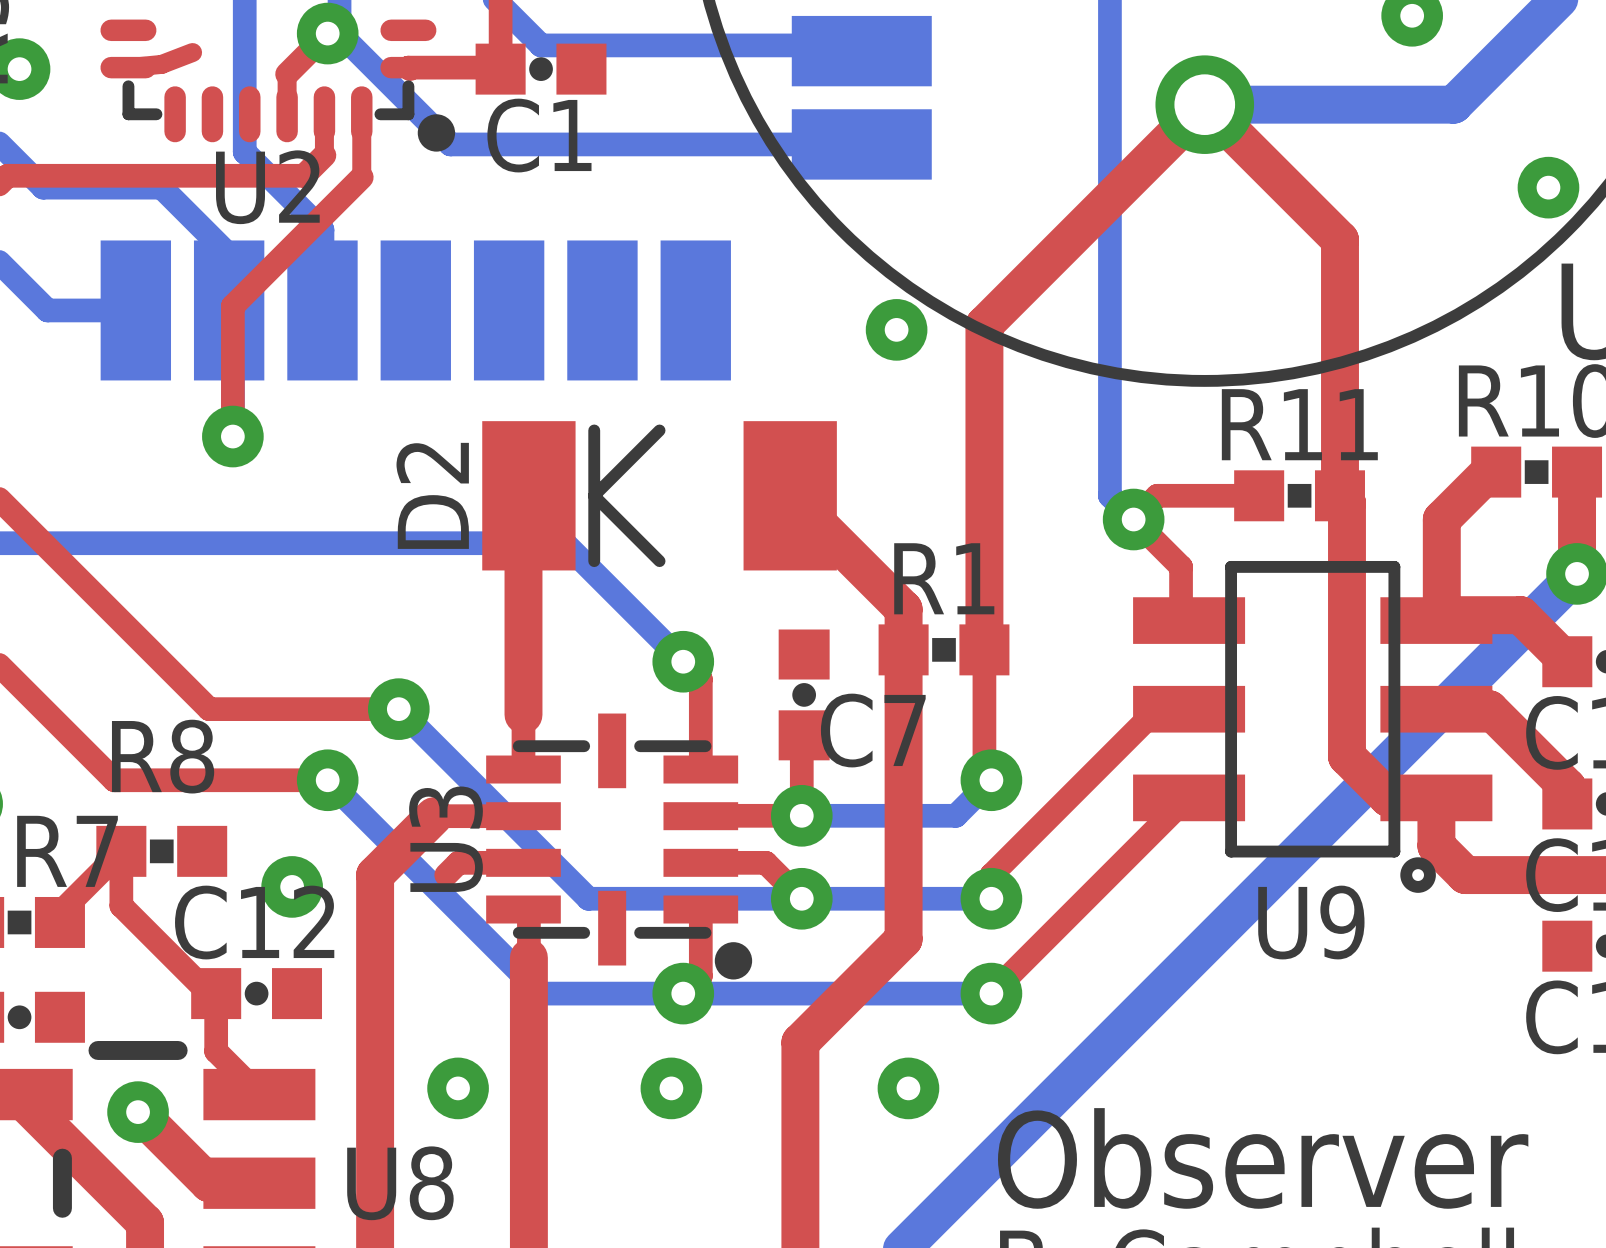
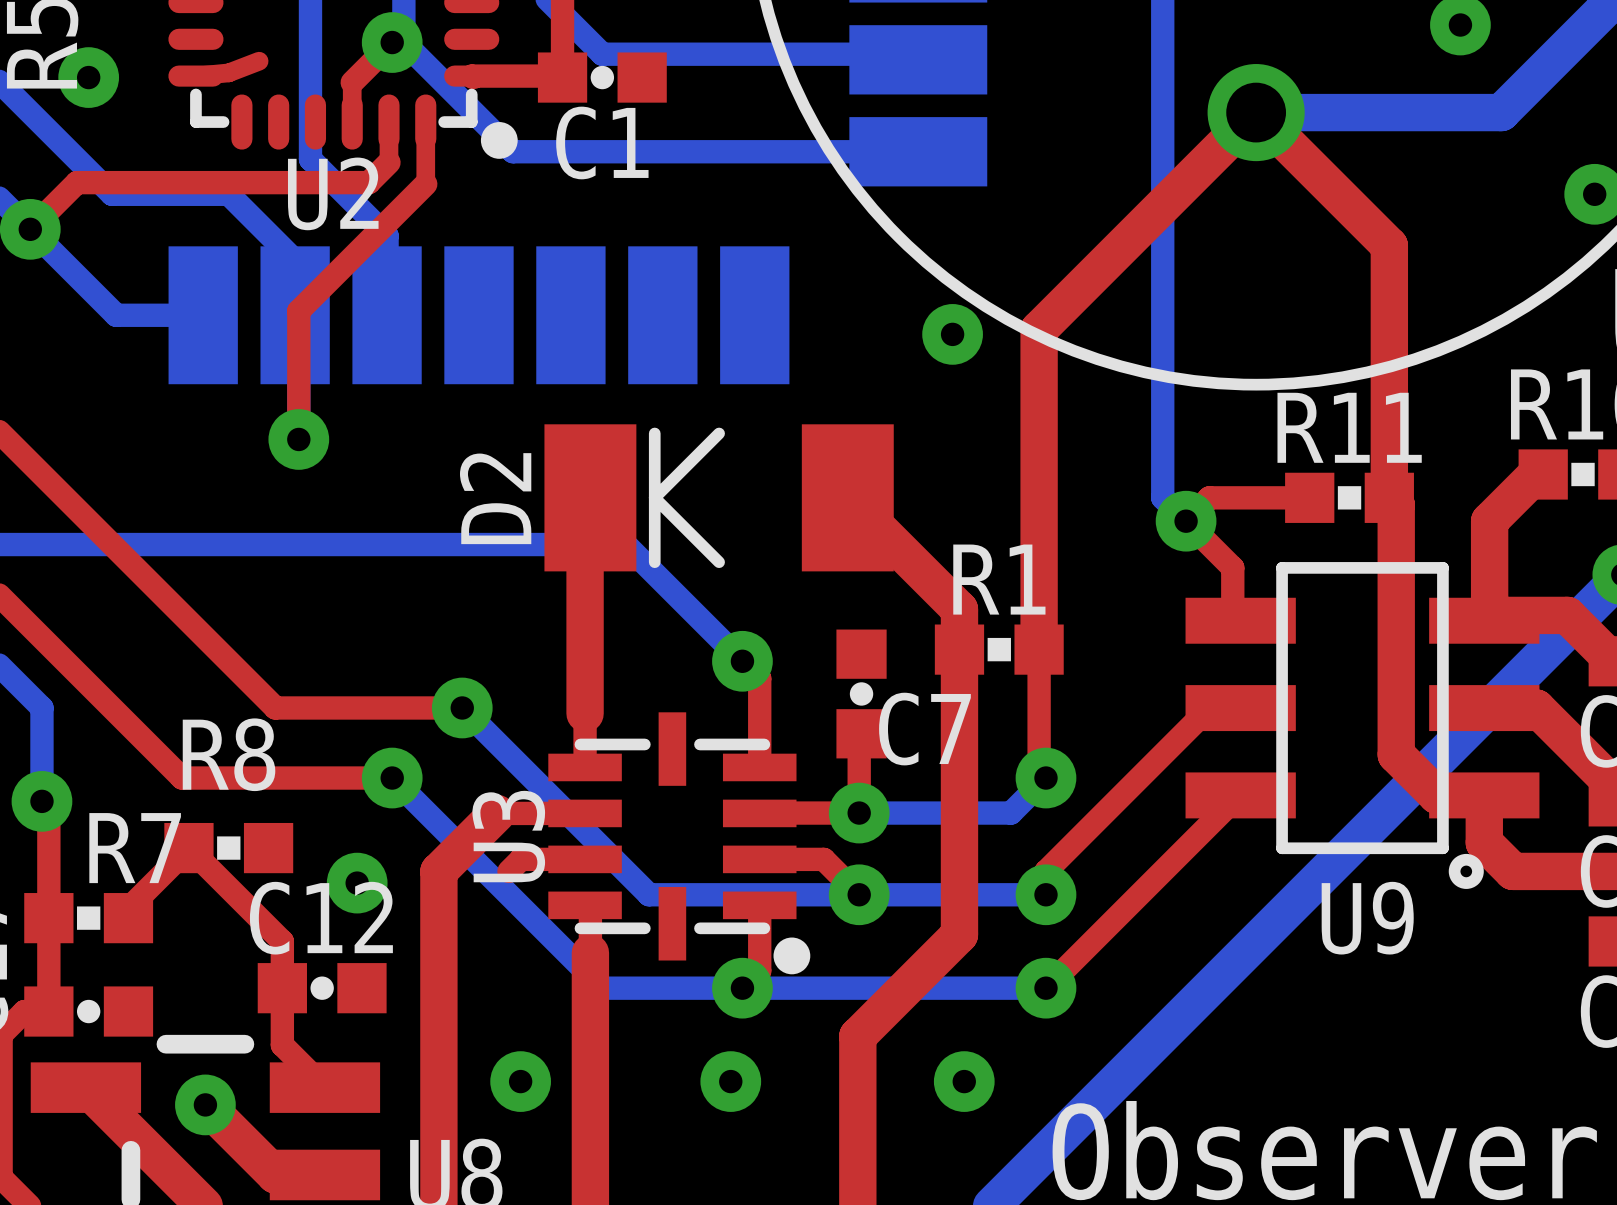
top track: (121, 851) (121, 905) (209, 993) (216, 993) -> (188, 848) (282, 941) (282, 988)

